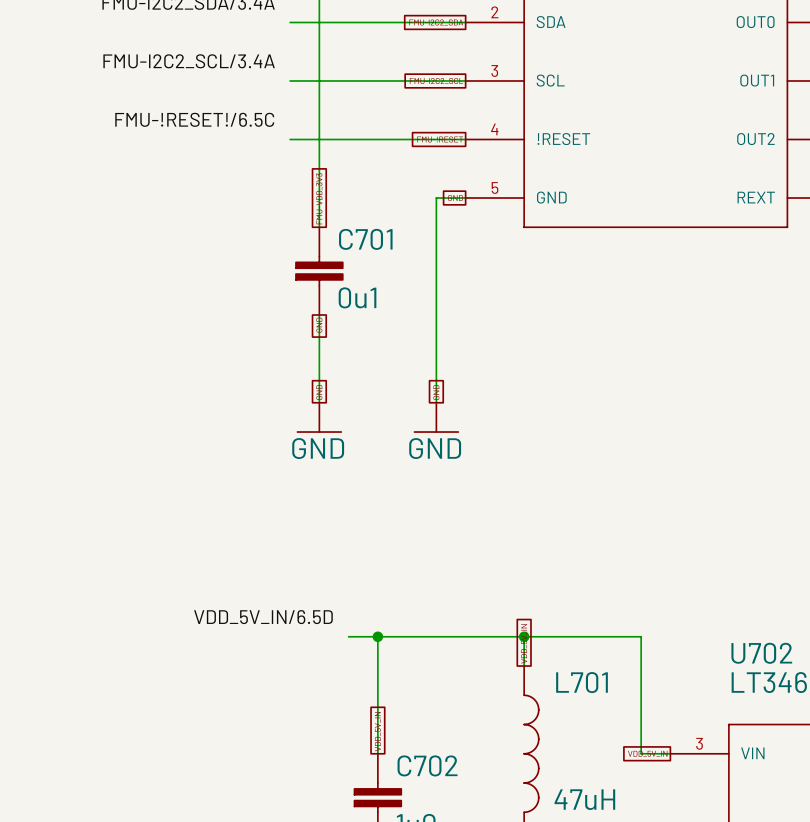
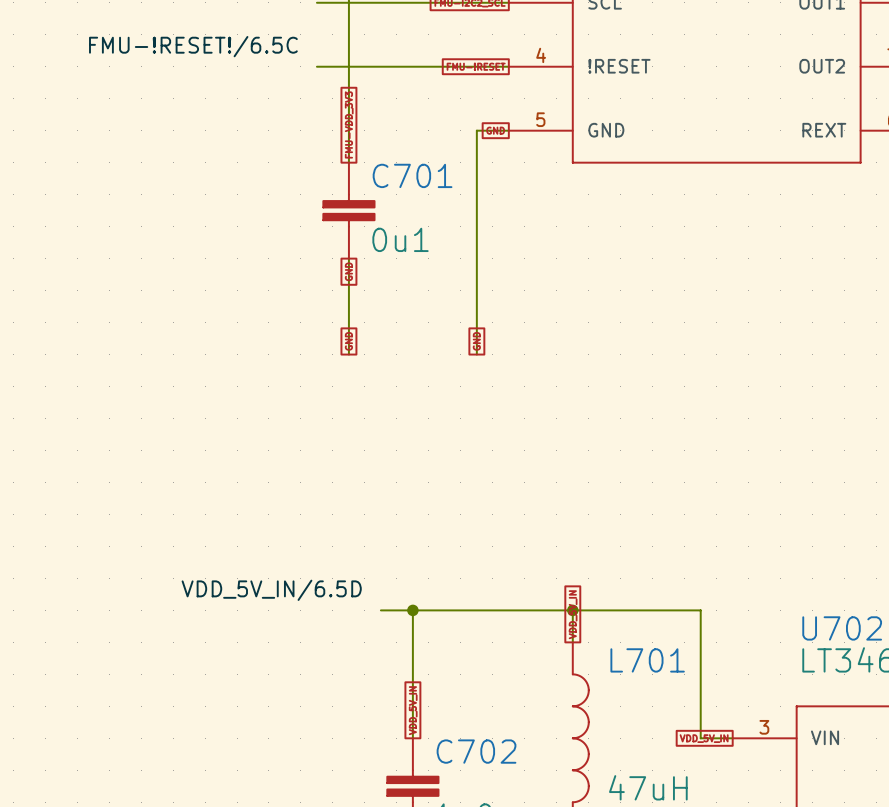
power symbol: GND (319, 417) -> none
power symbol: GND (436, 417) -> none

